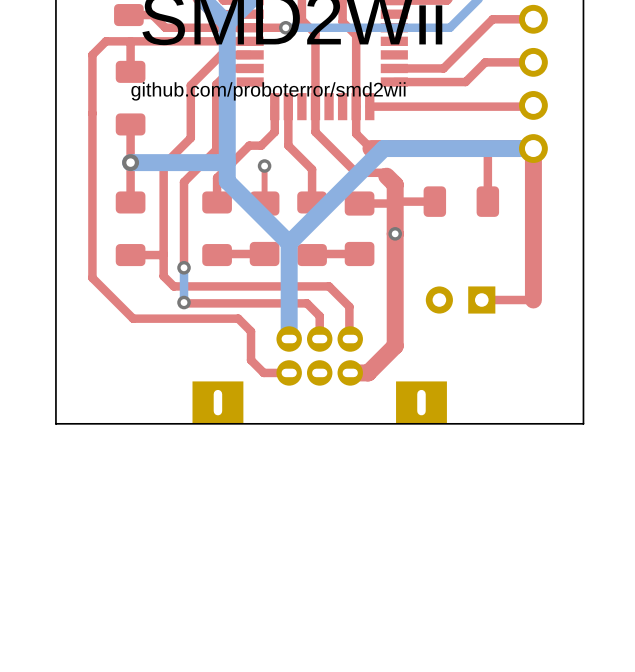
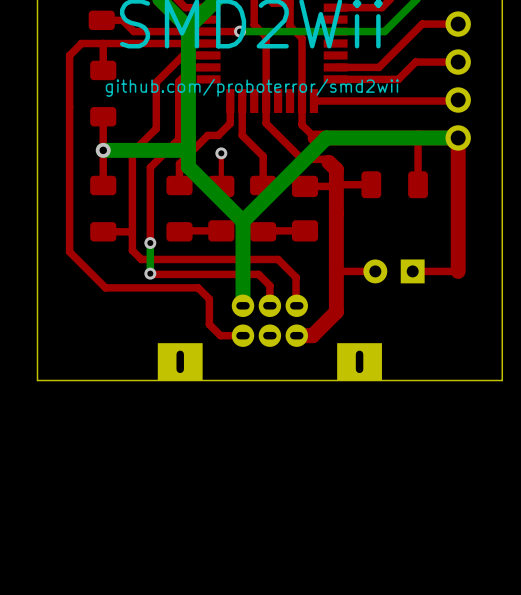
via: (395, 233) -> none
top track: none -> (375, 271) (336, 271)

